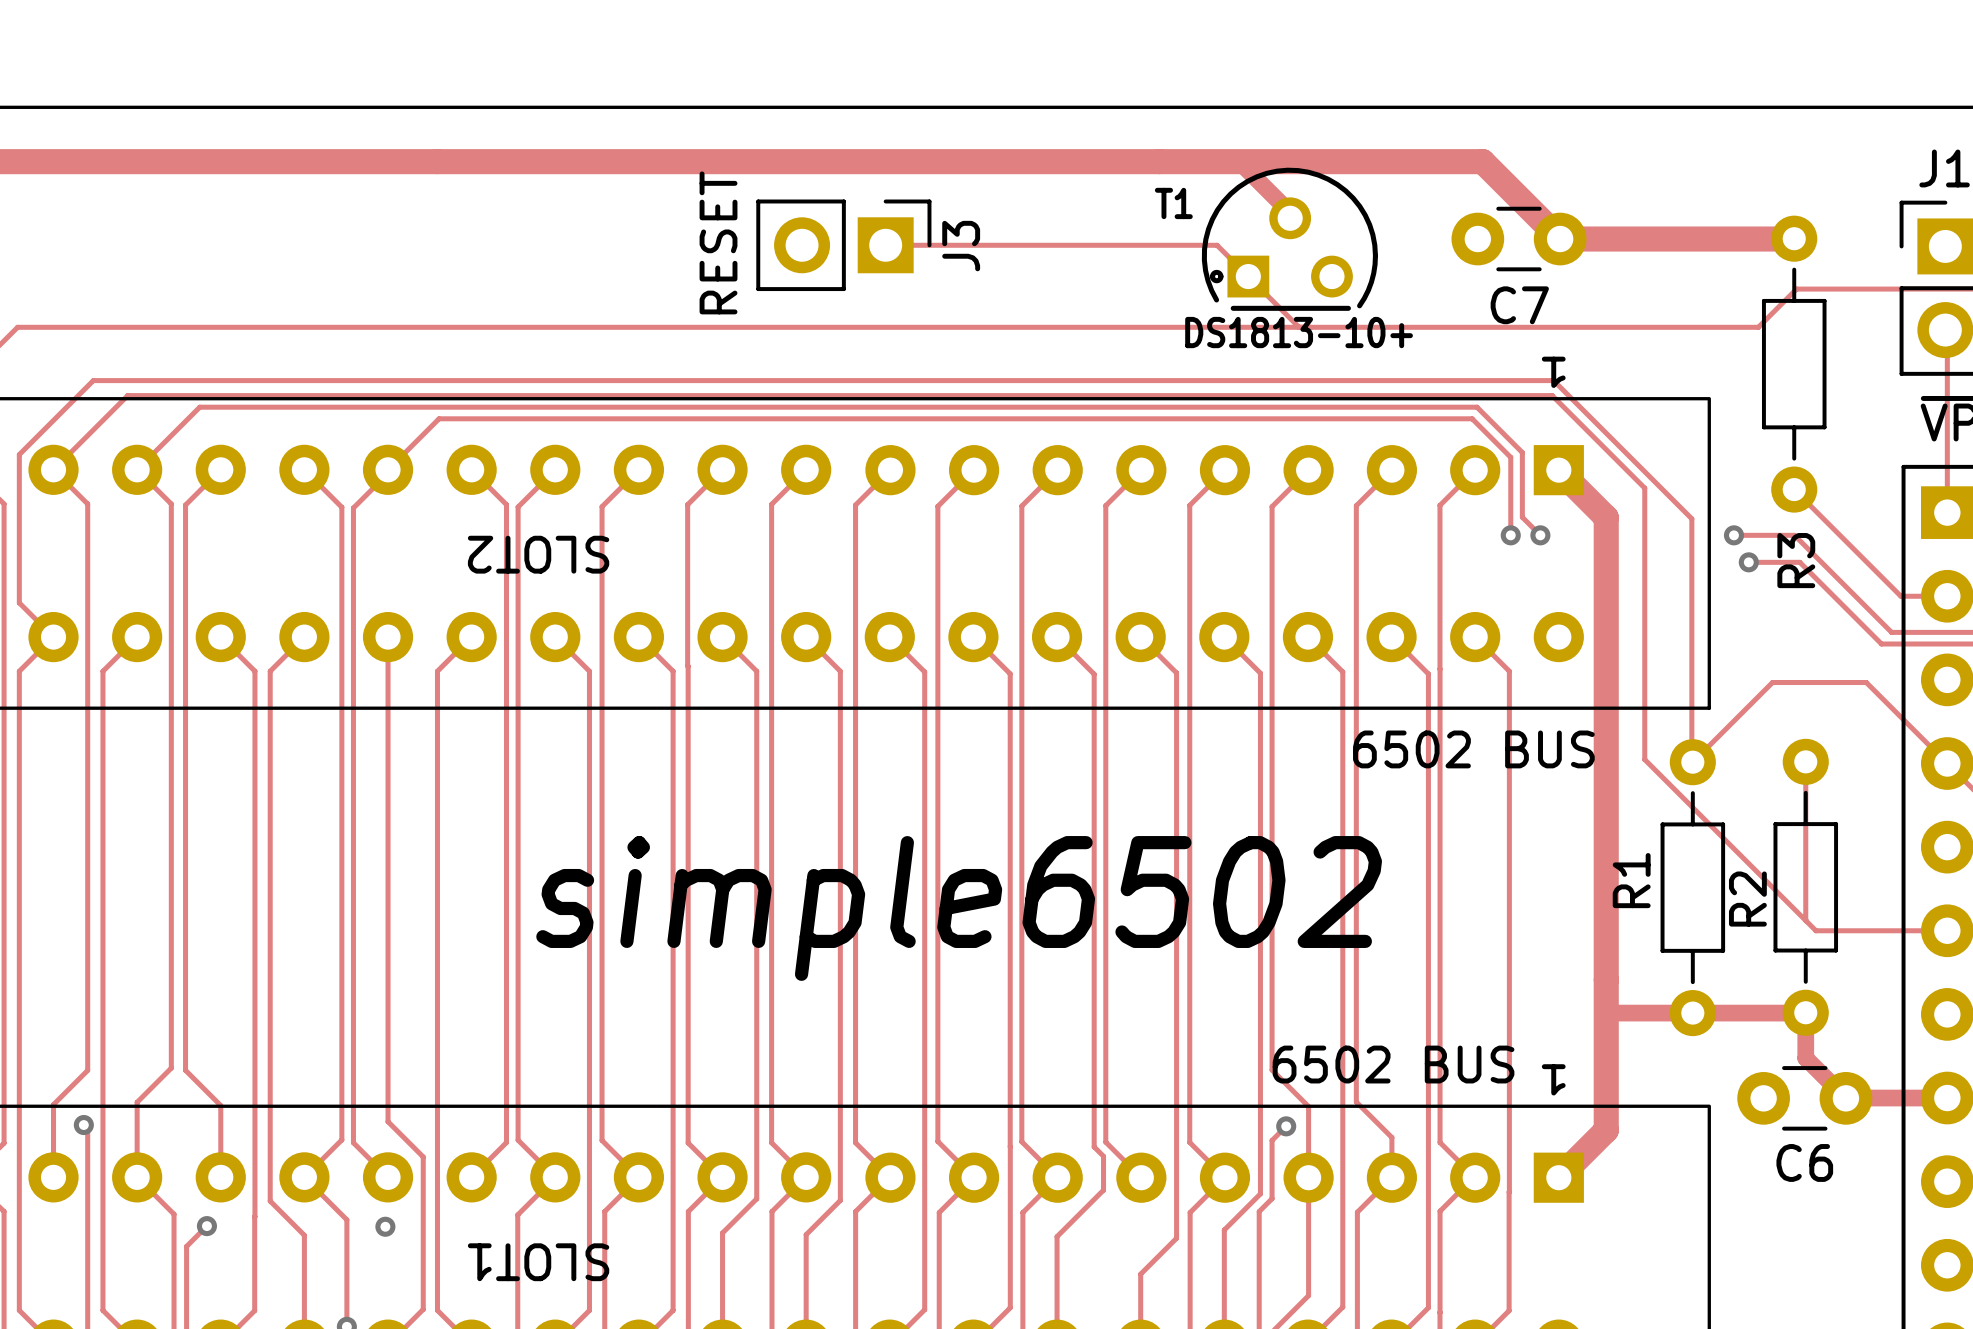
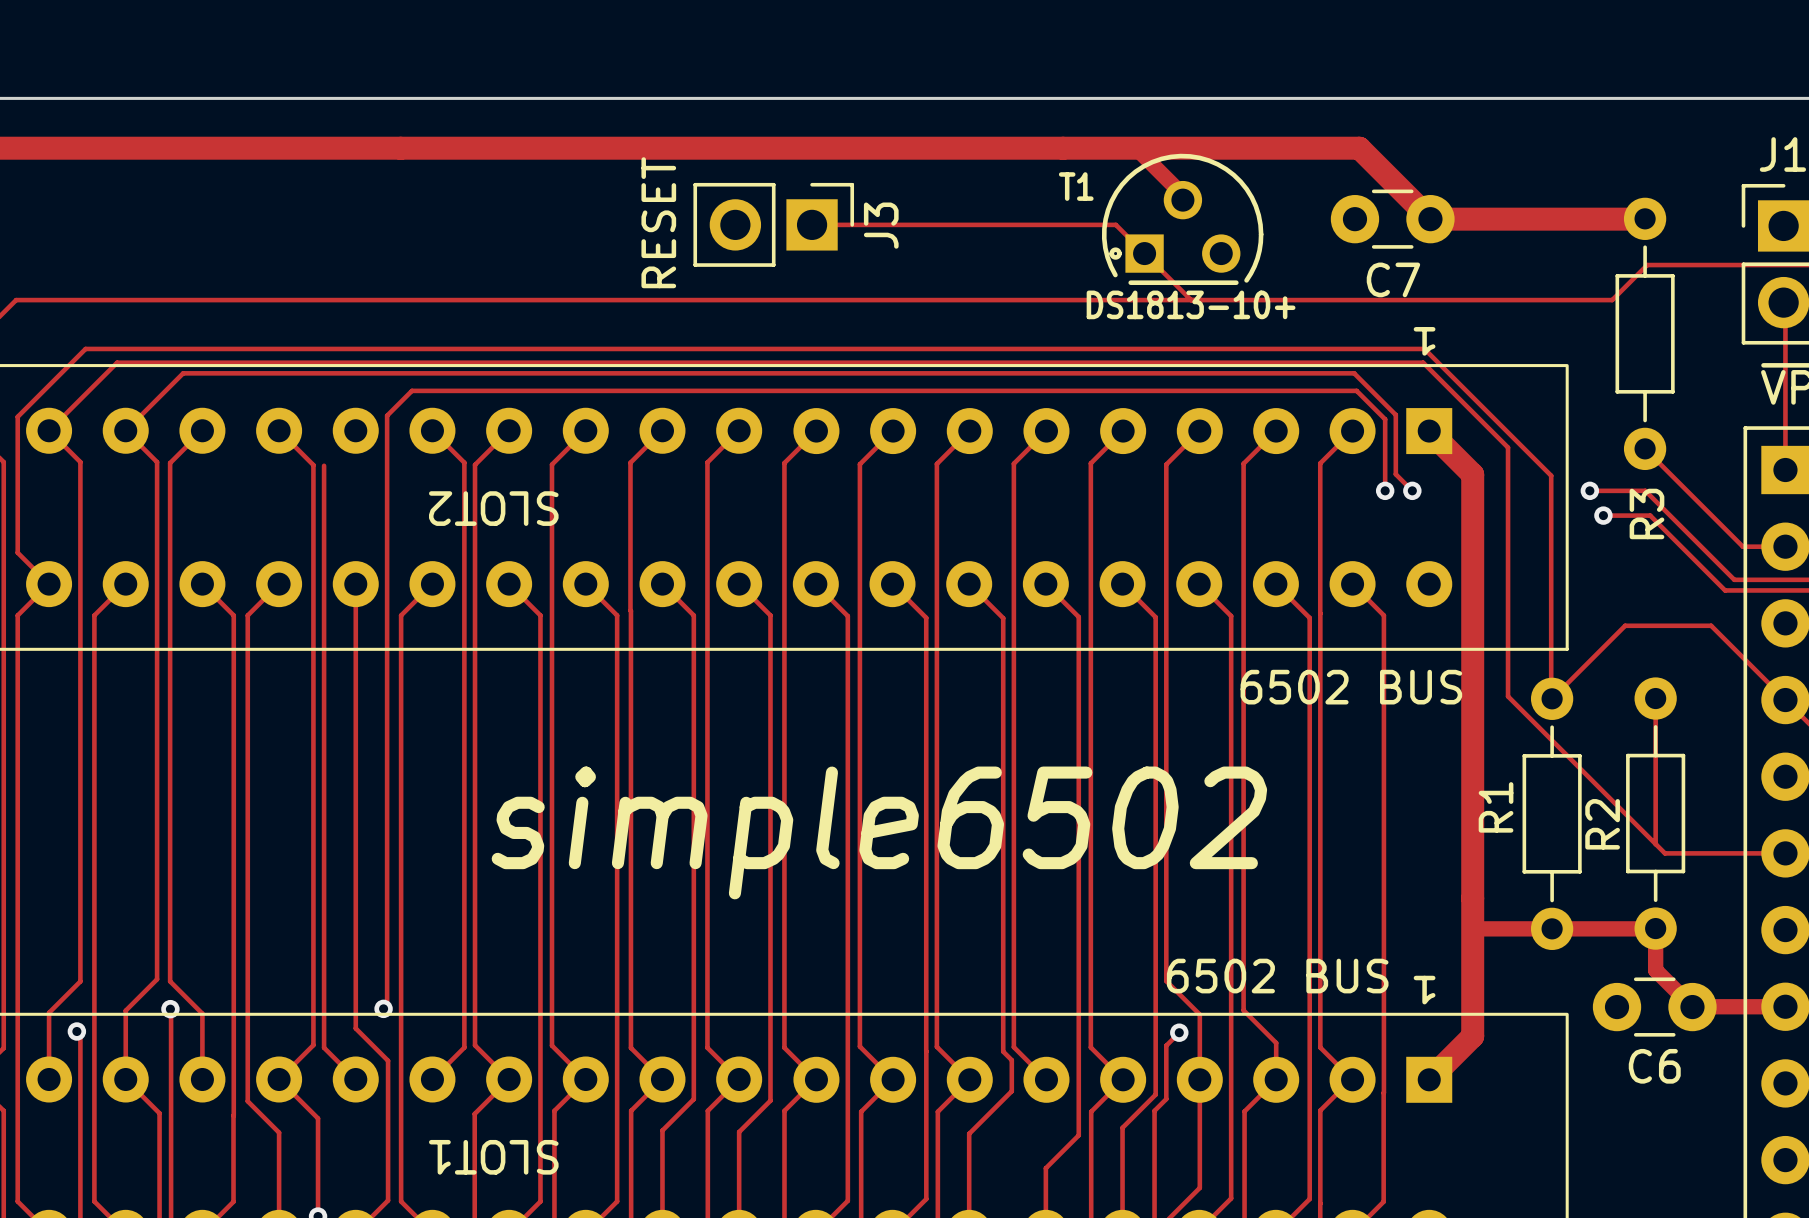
track: (1479, 426) (1472, 418) (439, 418) (353, 508) -> (1356, 390) (411, 390) (387, 415) (387, 1005) (383, 1008)
via: none -> (170, 1009)
via: none -> (383, 1008)
track: (206, 1226) (186, 1246) -> (170, 1009) (171, 1142)
via: (206, 1226) -> none
via: (385, 1226) -> none

